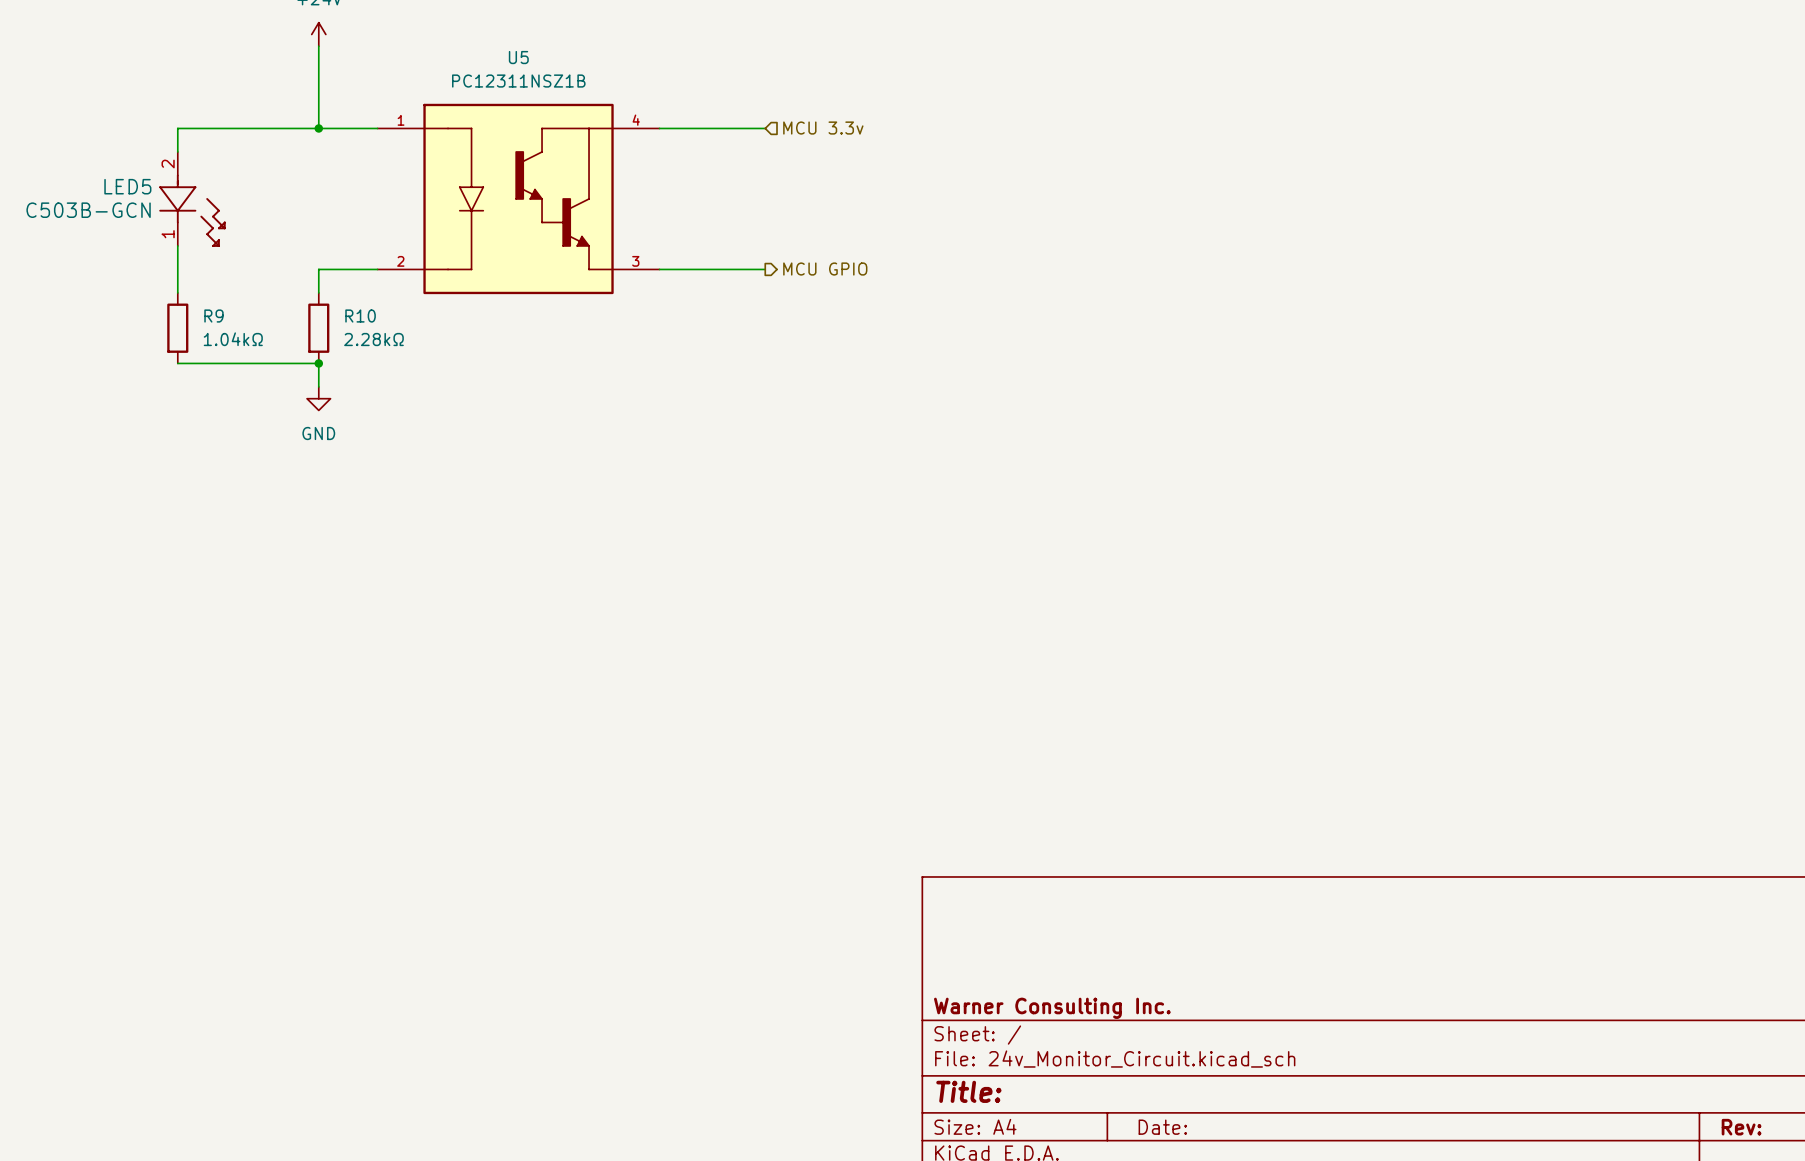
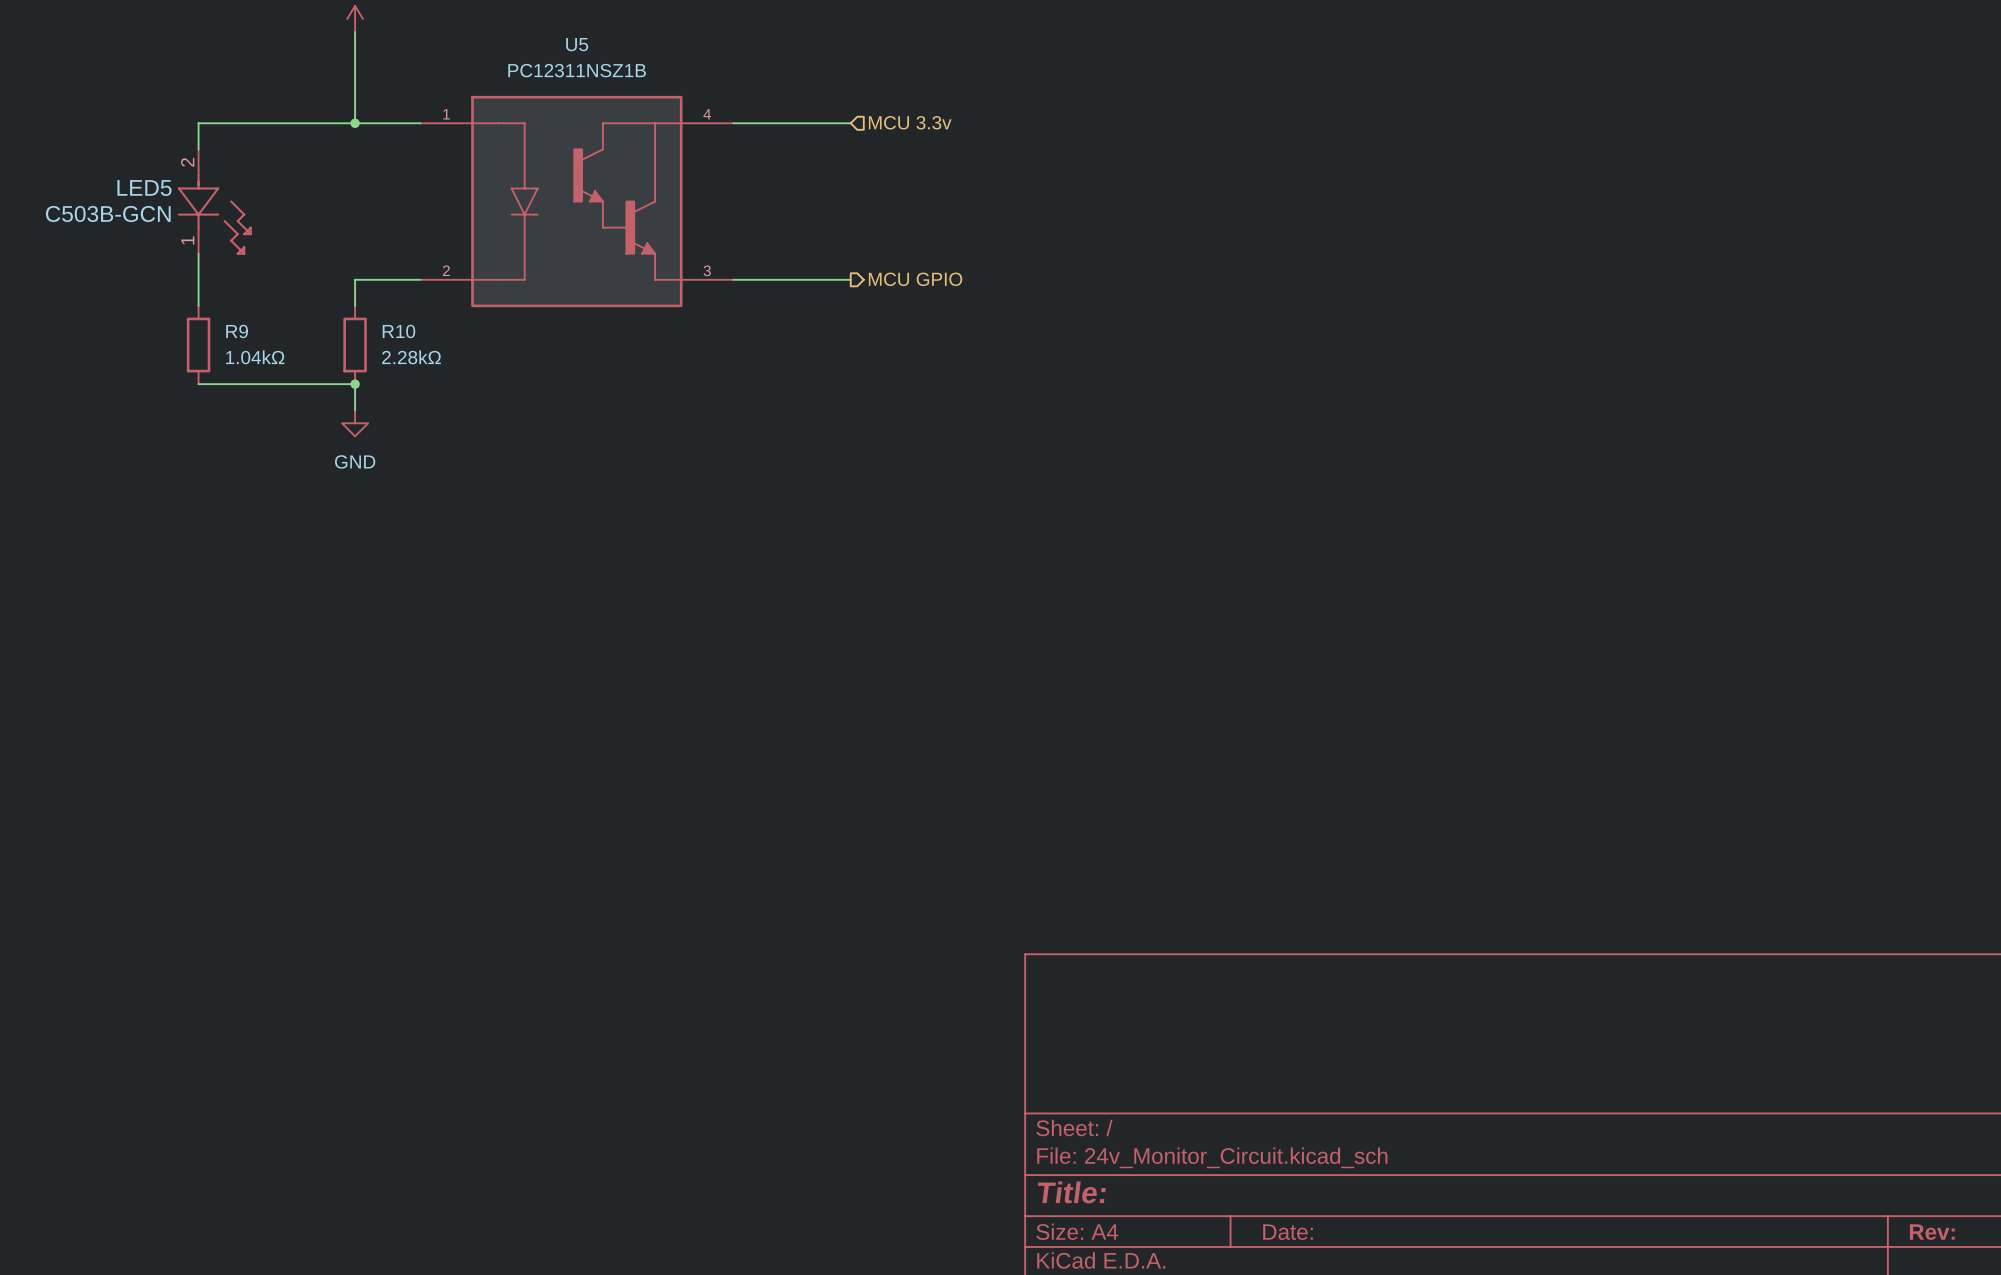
title block: Warner Consulting Inc. (1052, 1008) -> none

